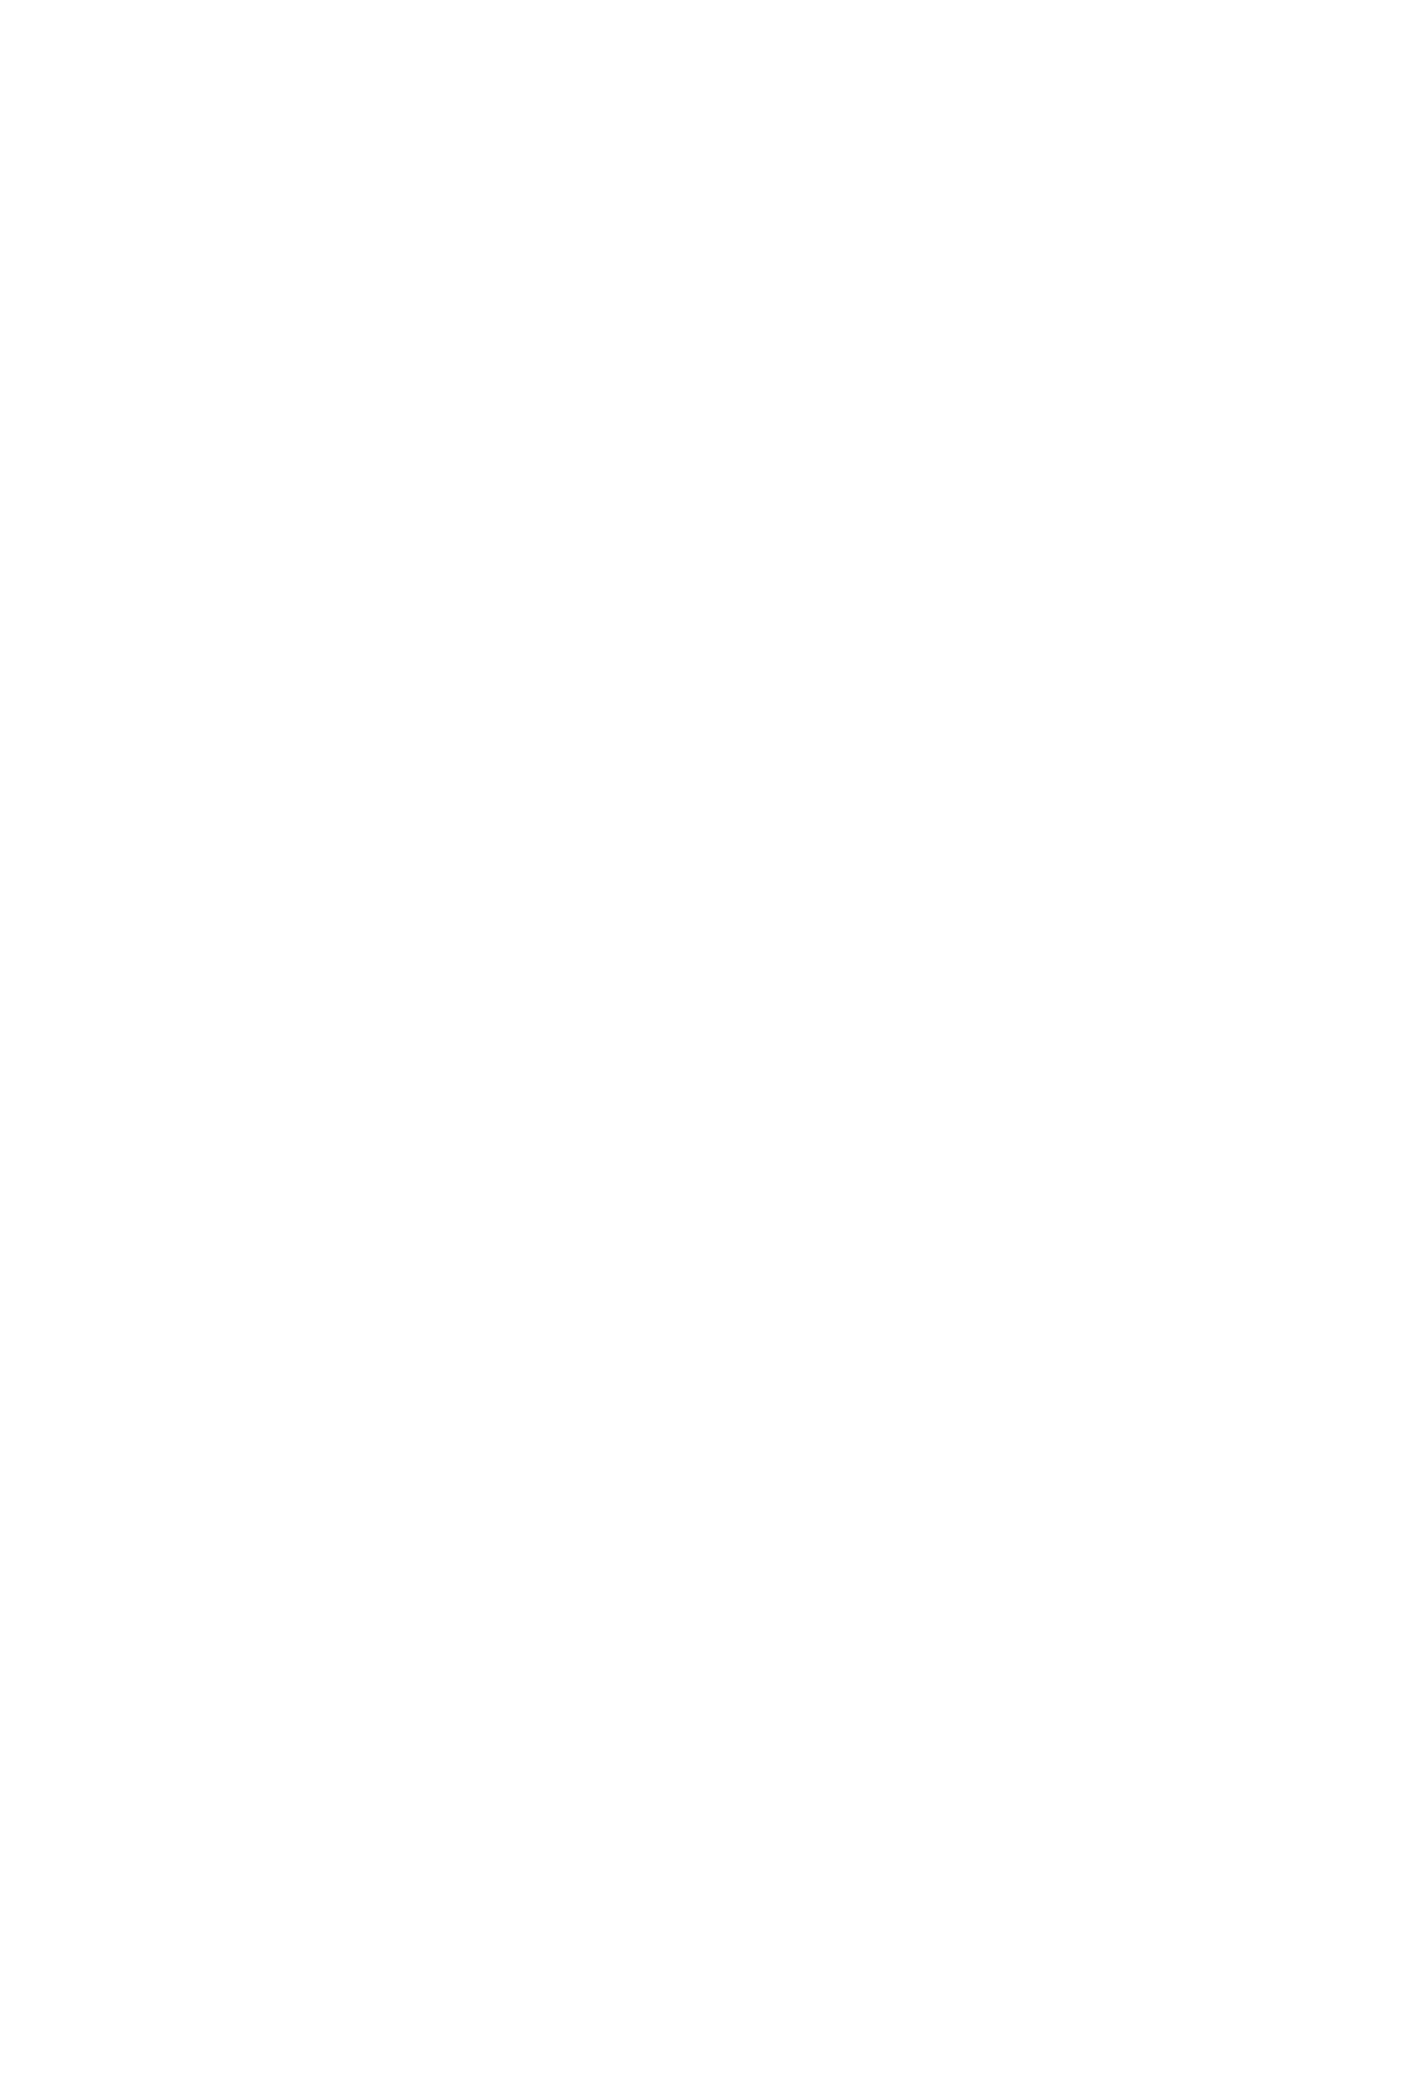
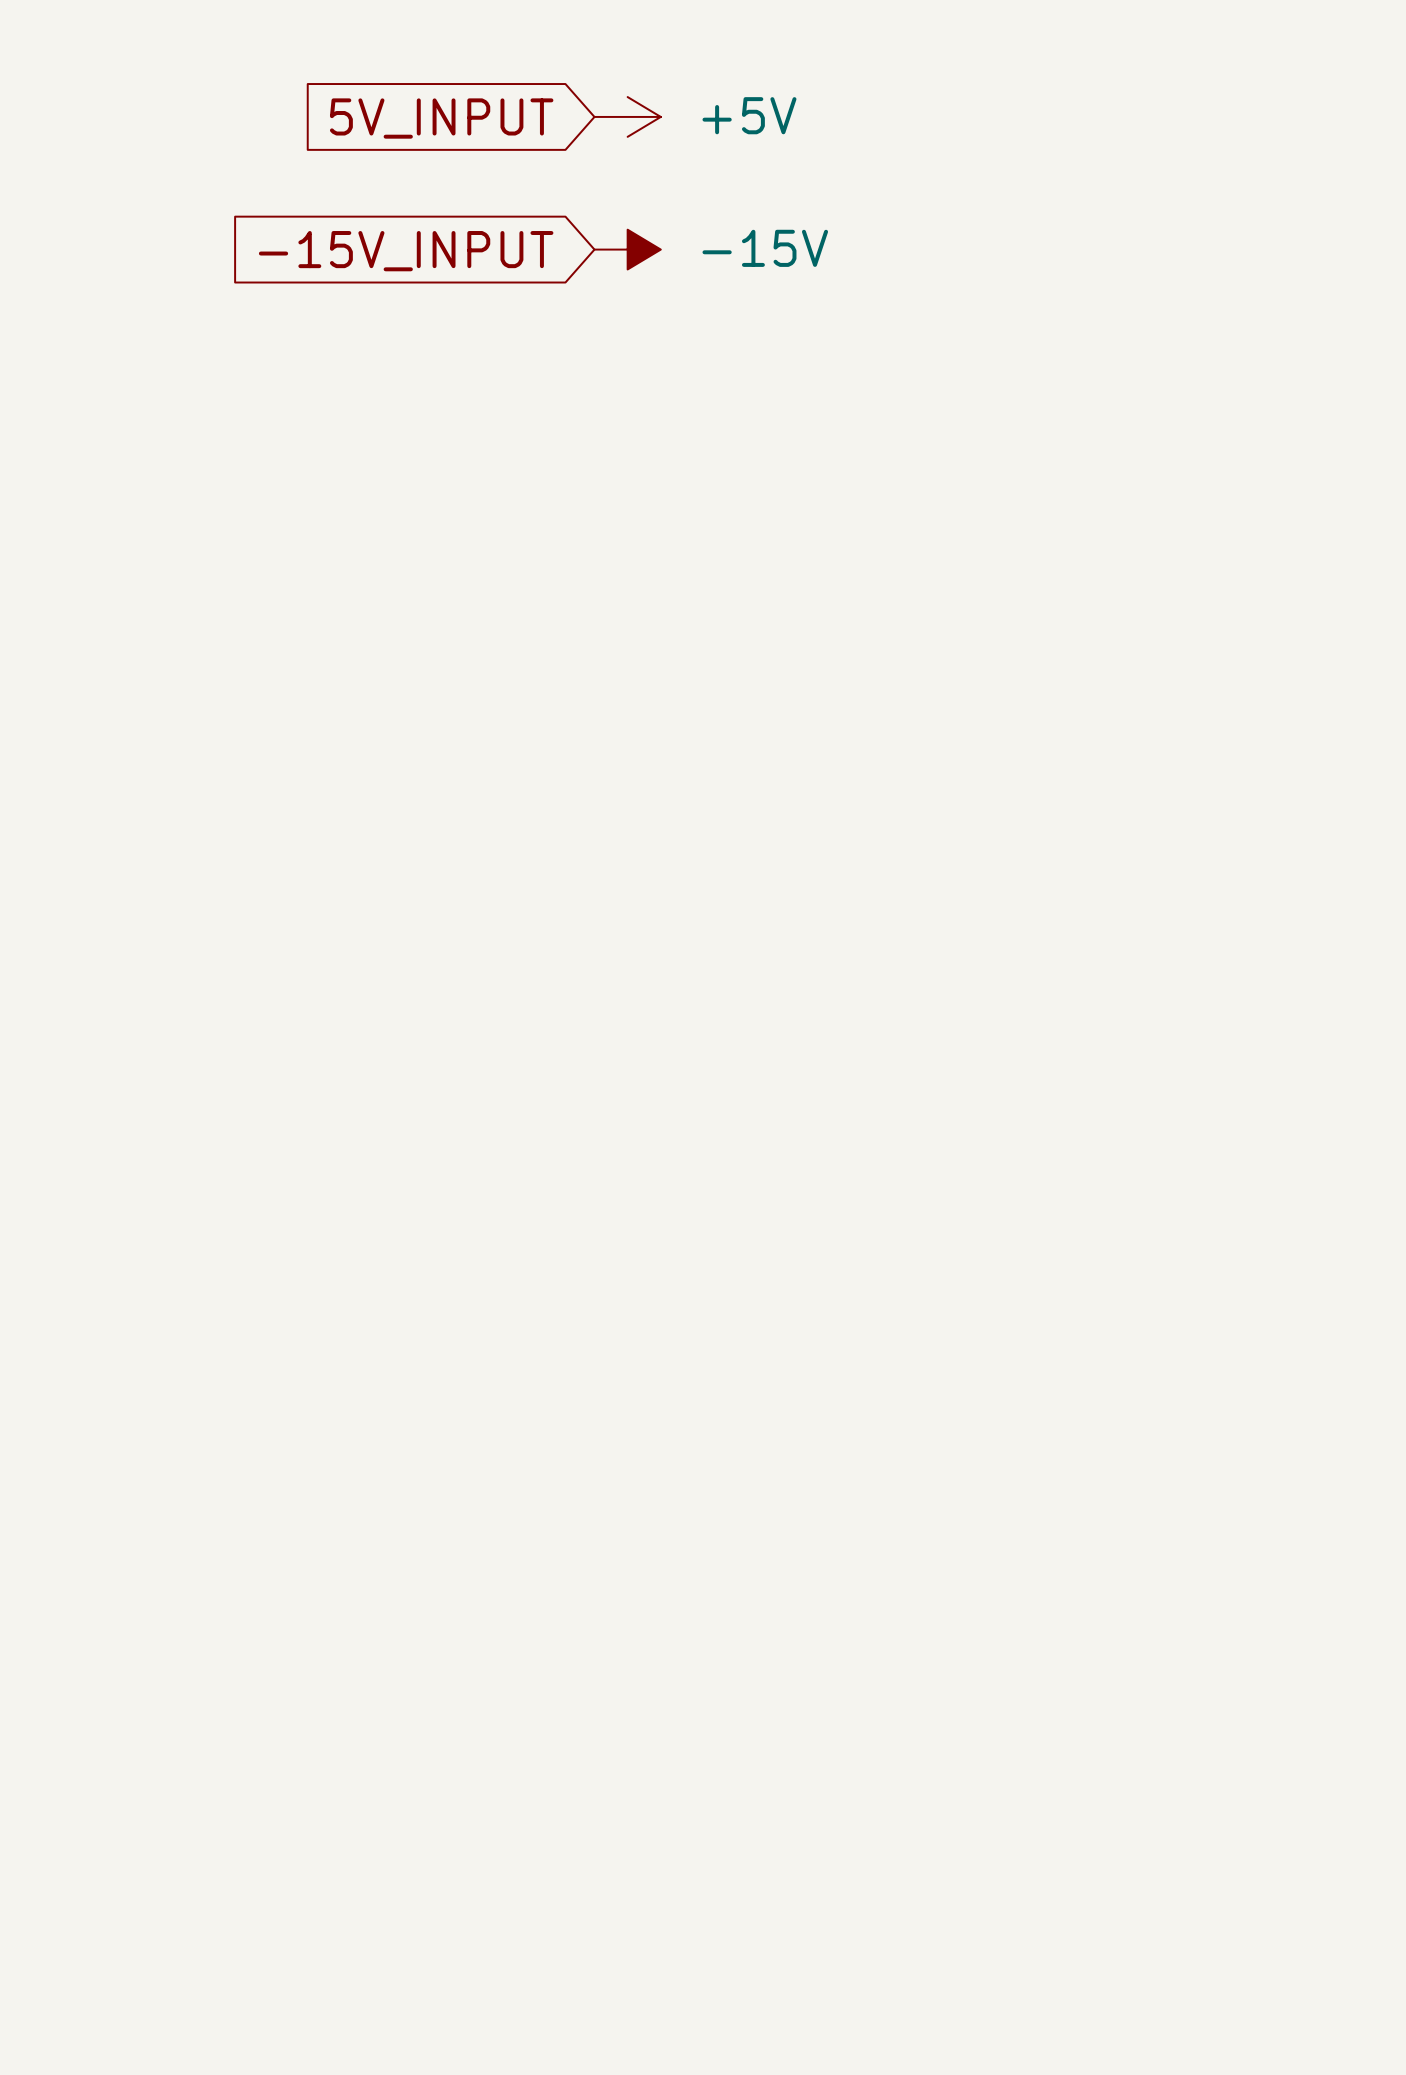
power symbol: none -> +5V (627, 116)
global label: none -> 5V_INPUT (441, 118)
power symbol: none -> -15V (627, 249)
global label: none -> -15V_INPUT (406, 251)

